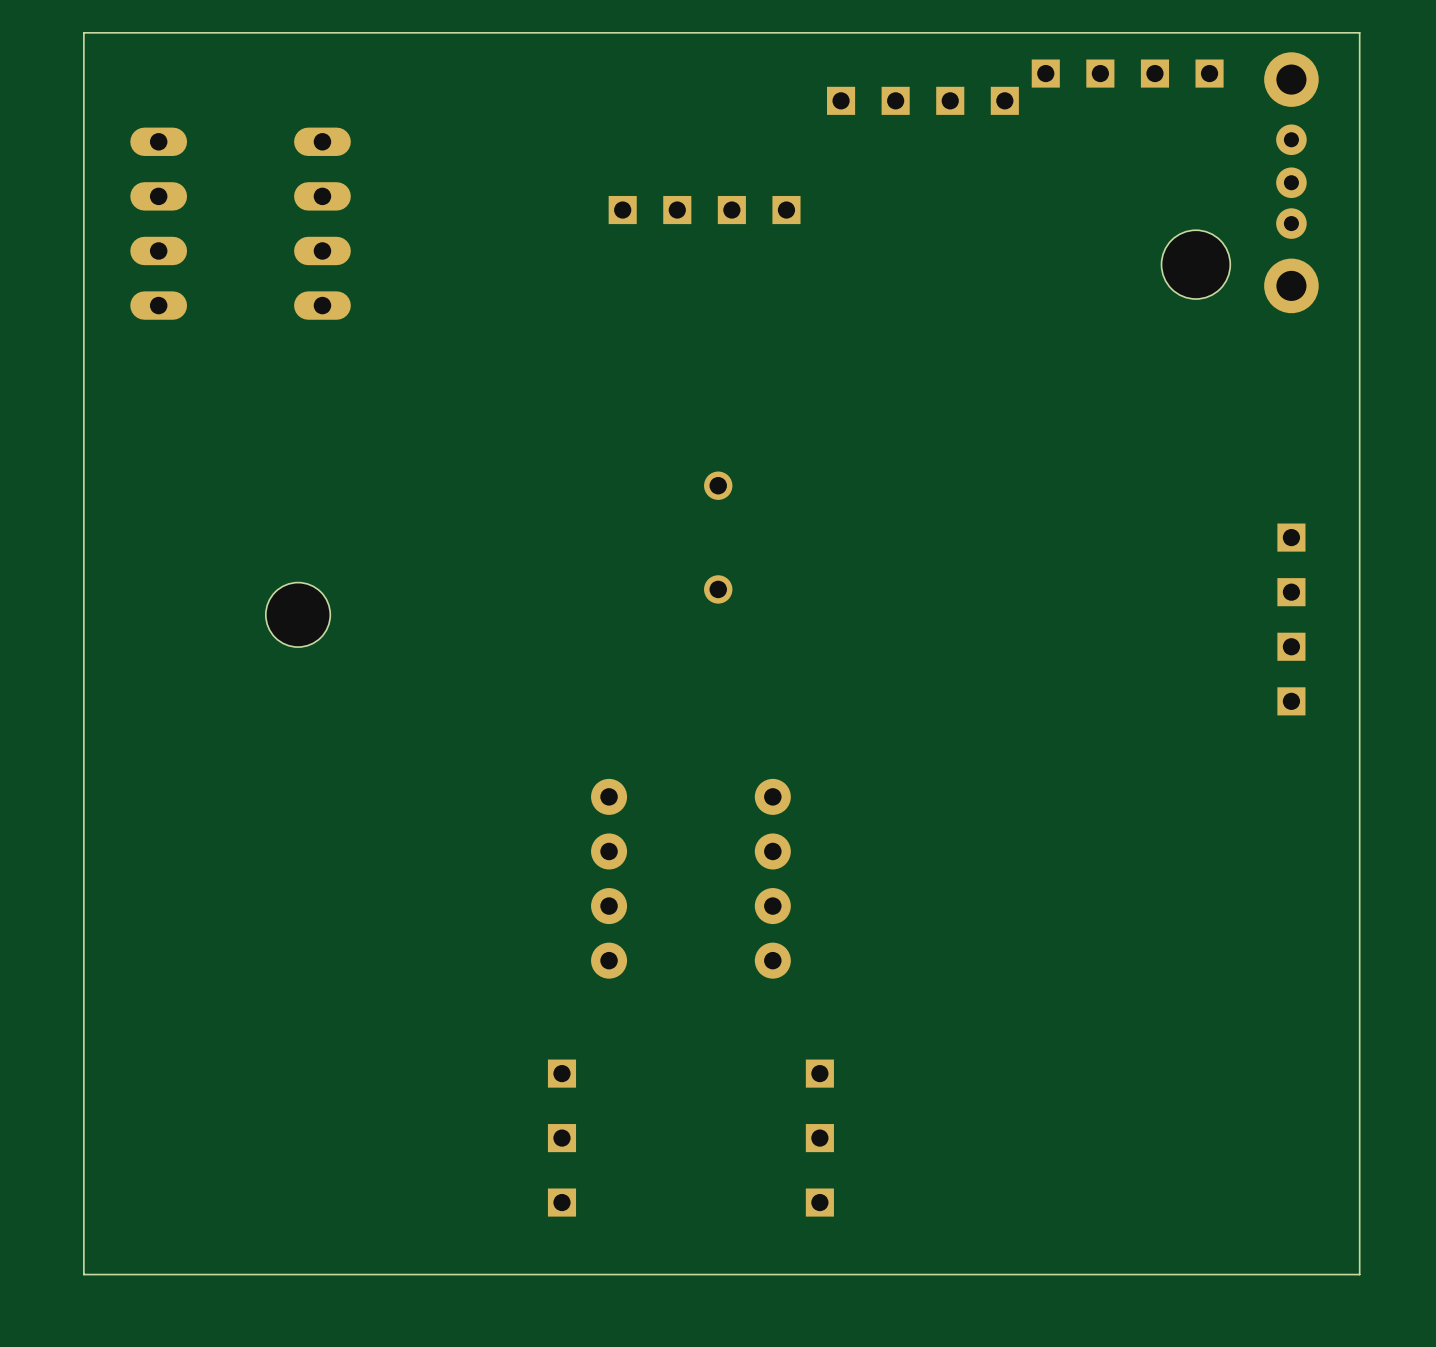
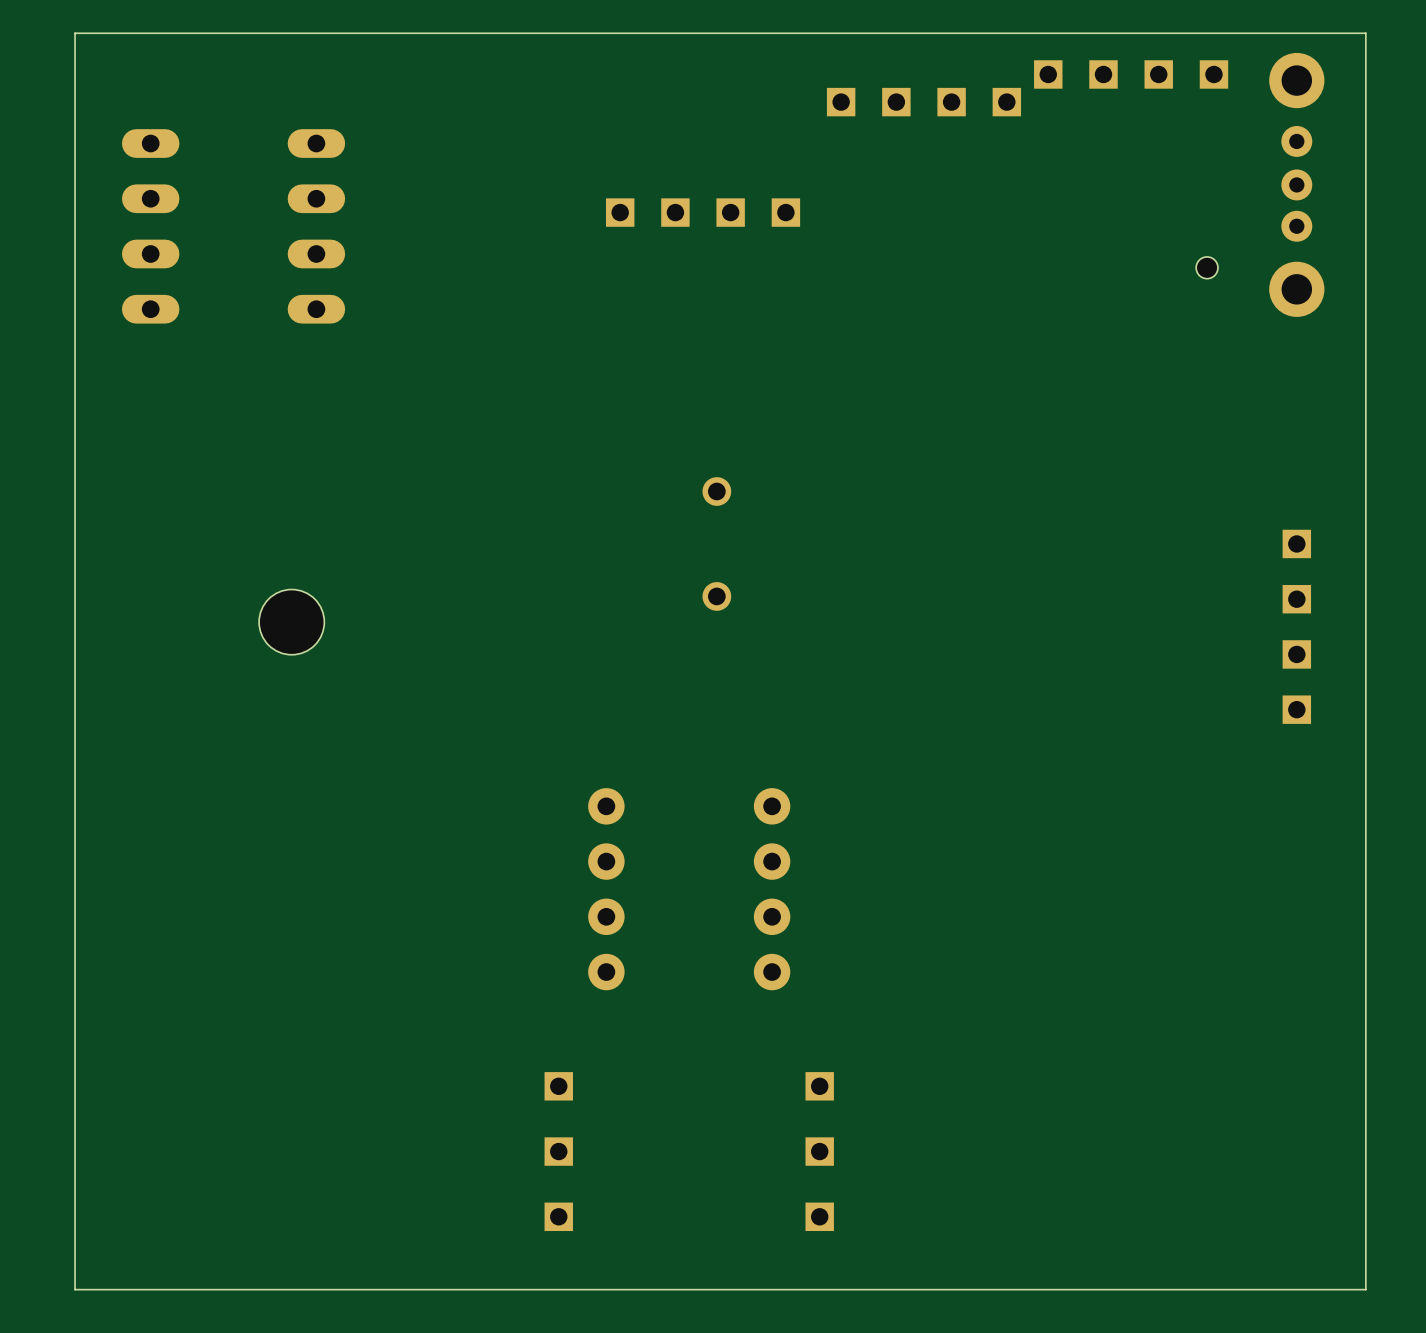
hole size: [1161, 230, 1231, 300] -> [1196, 256, 1218, 279]

